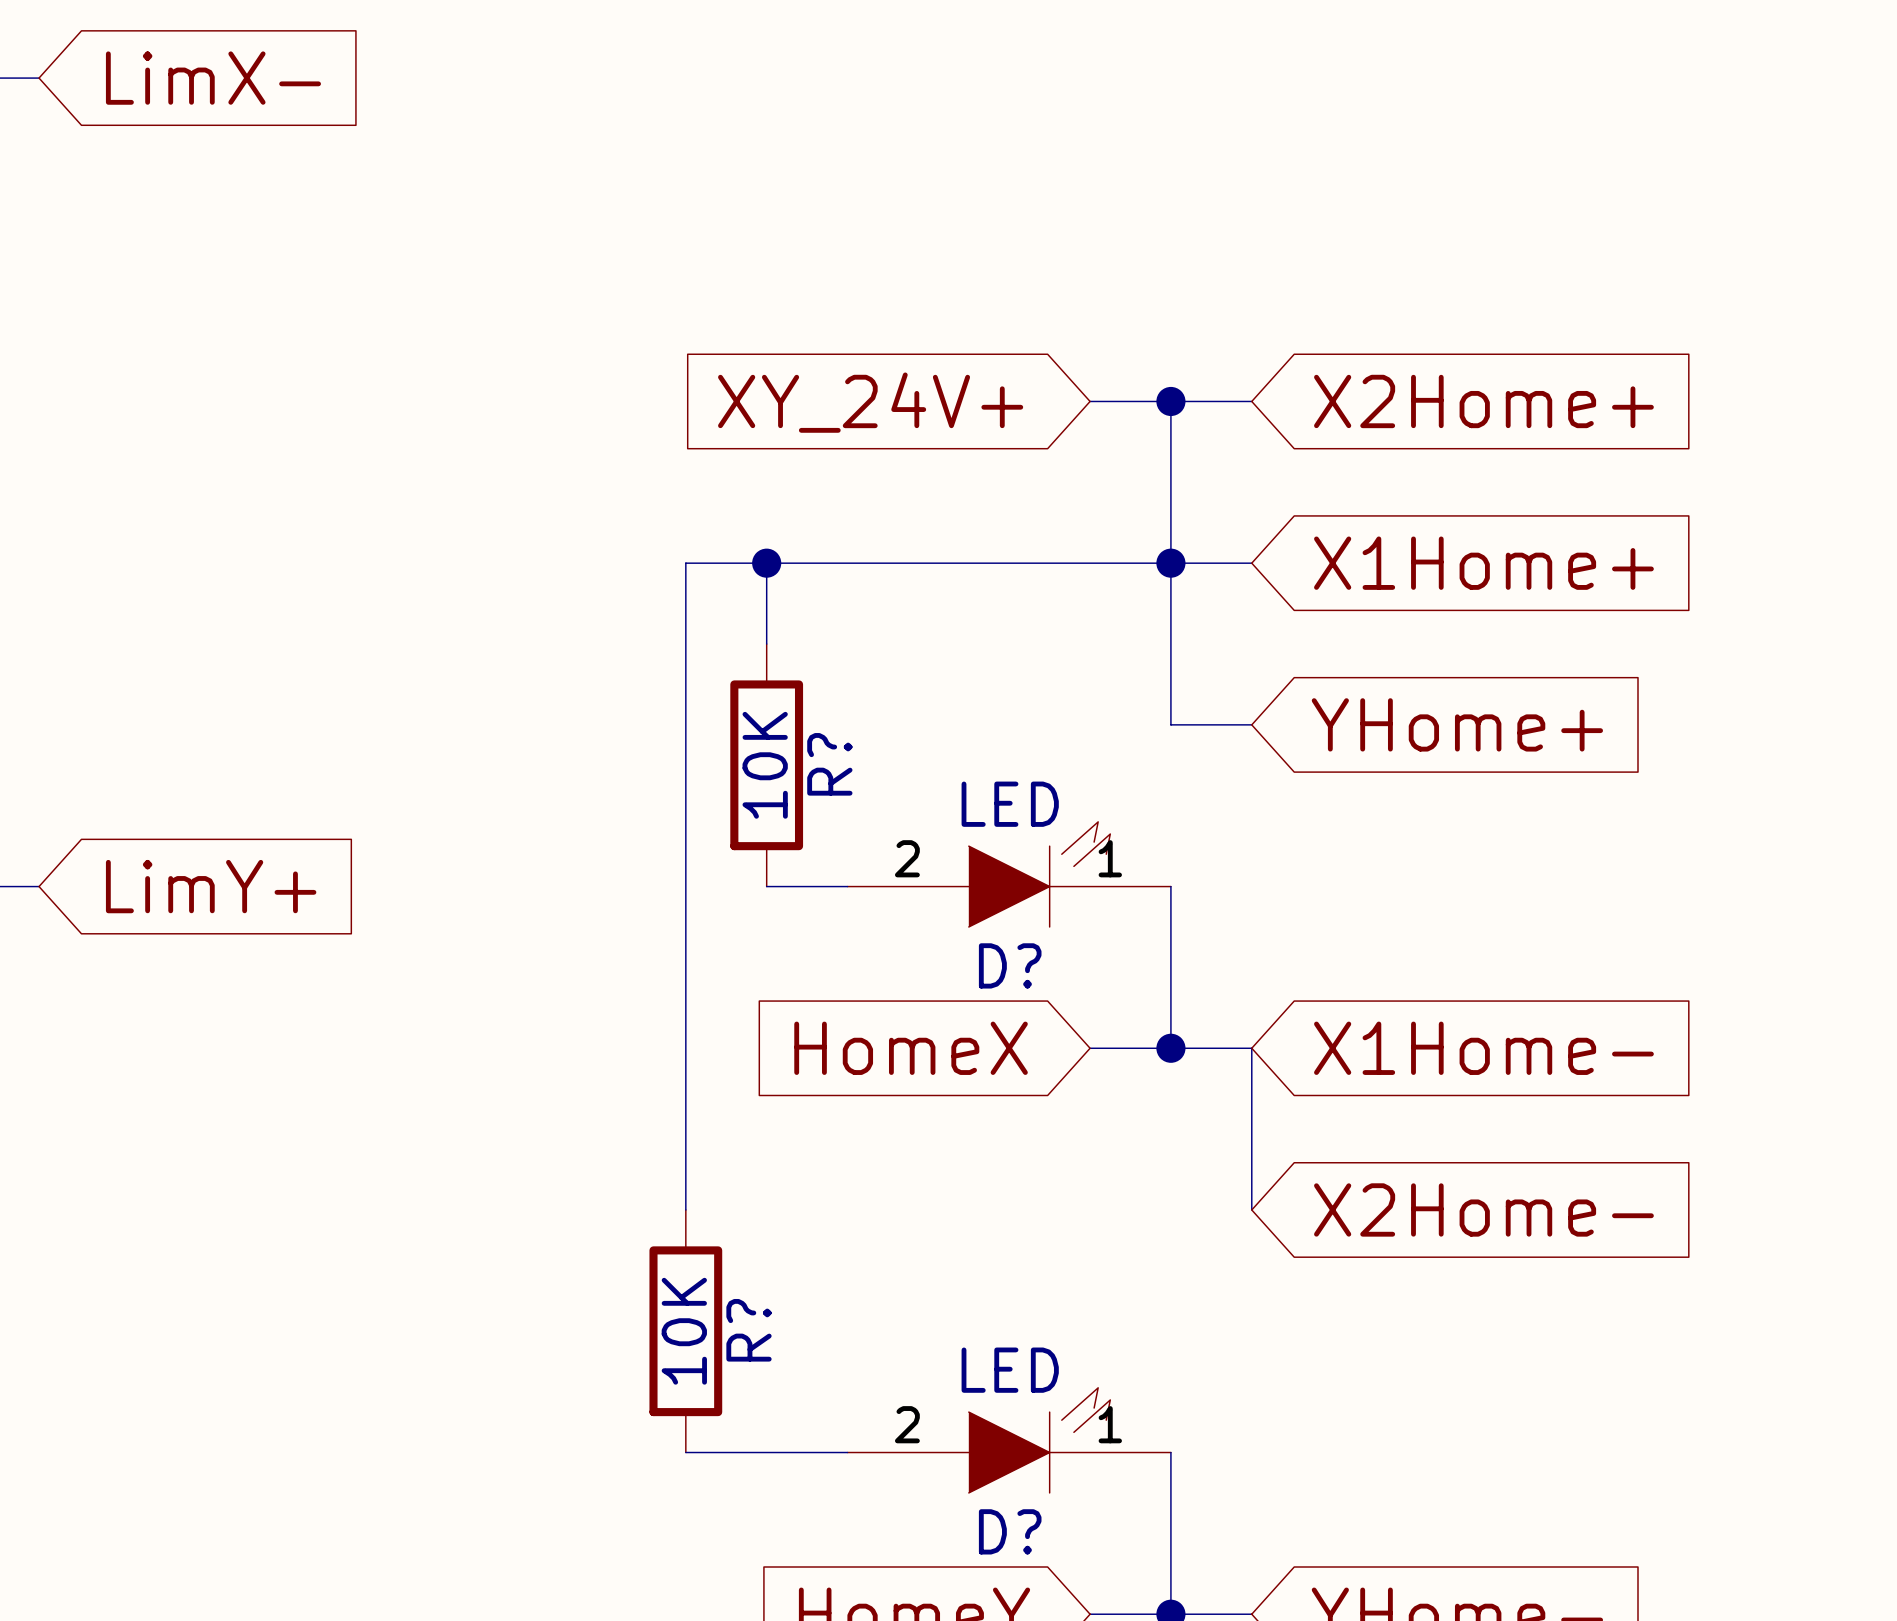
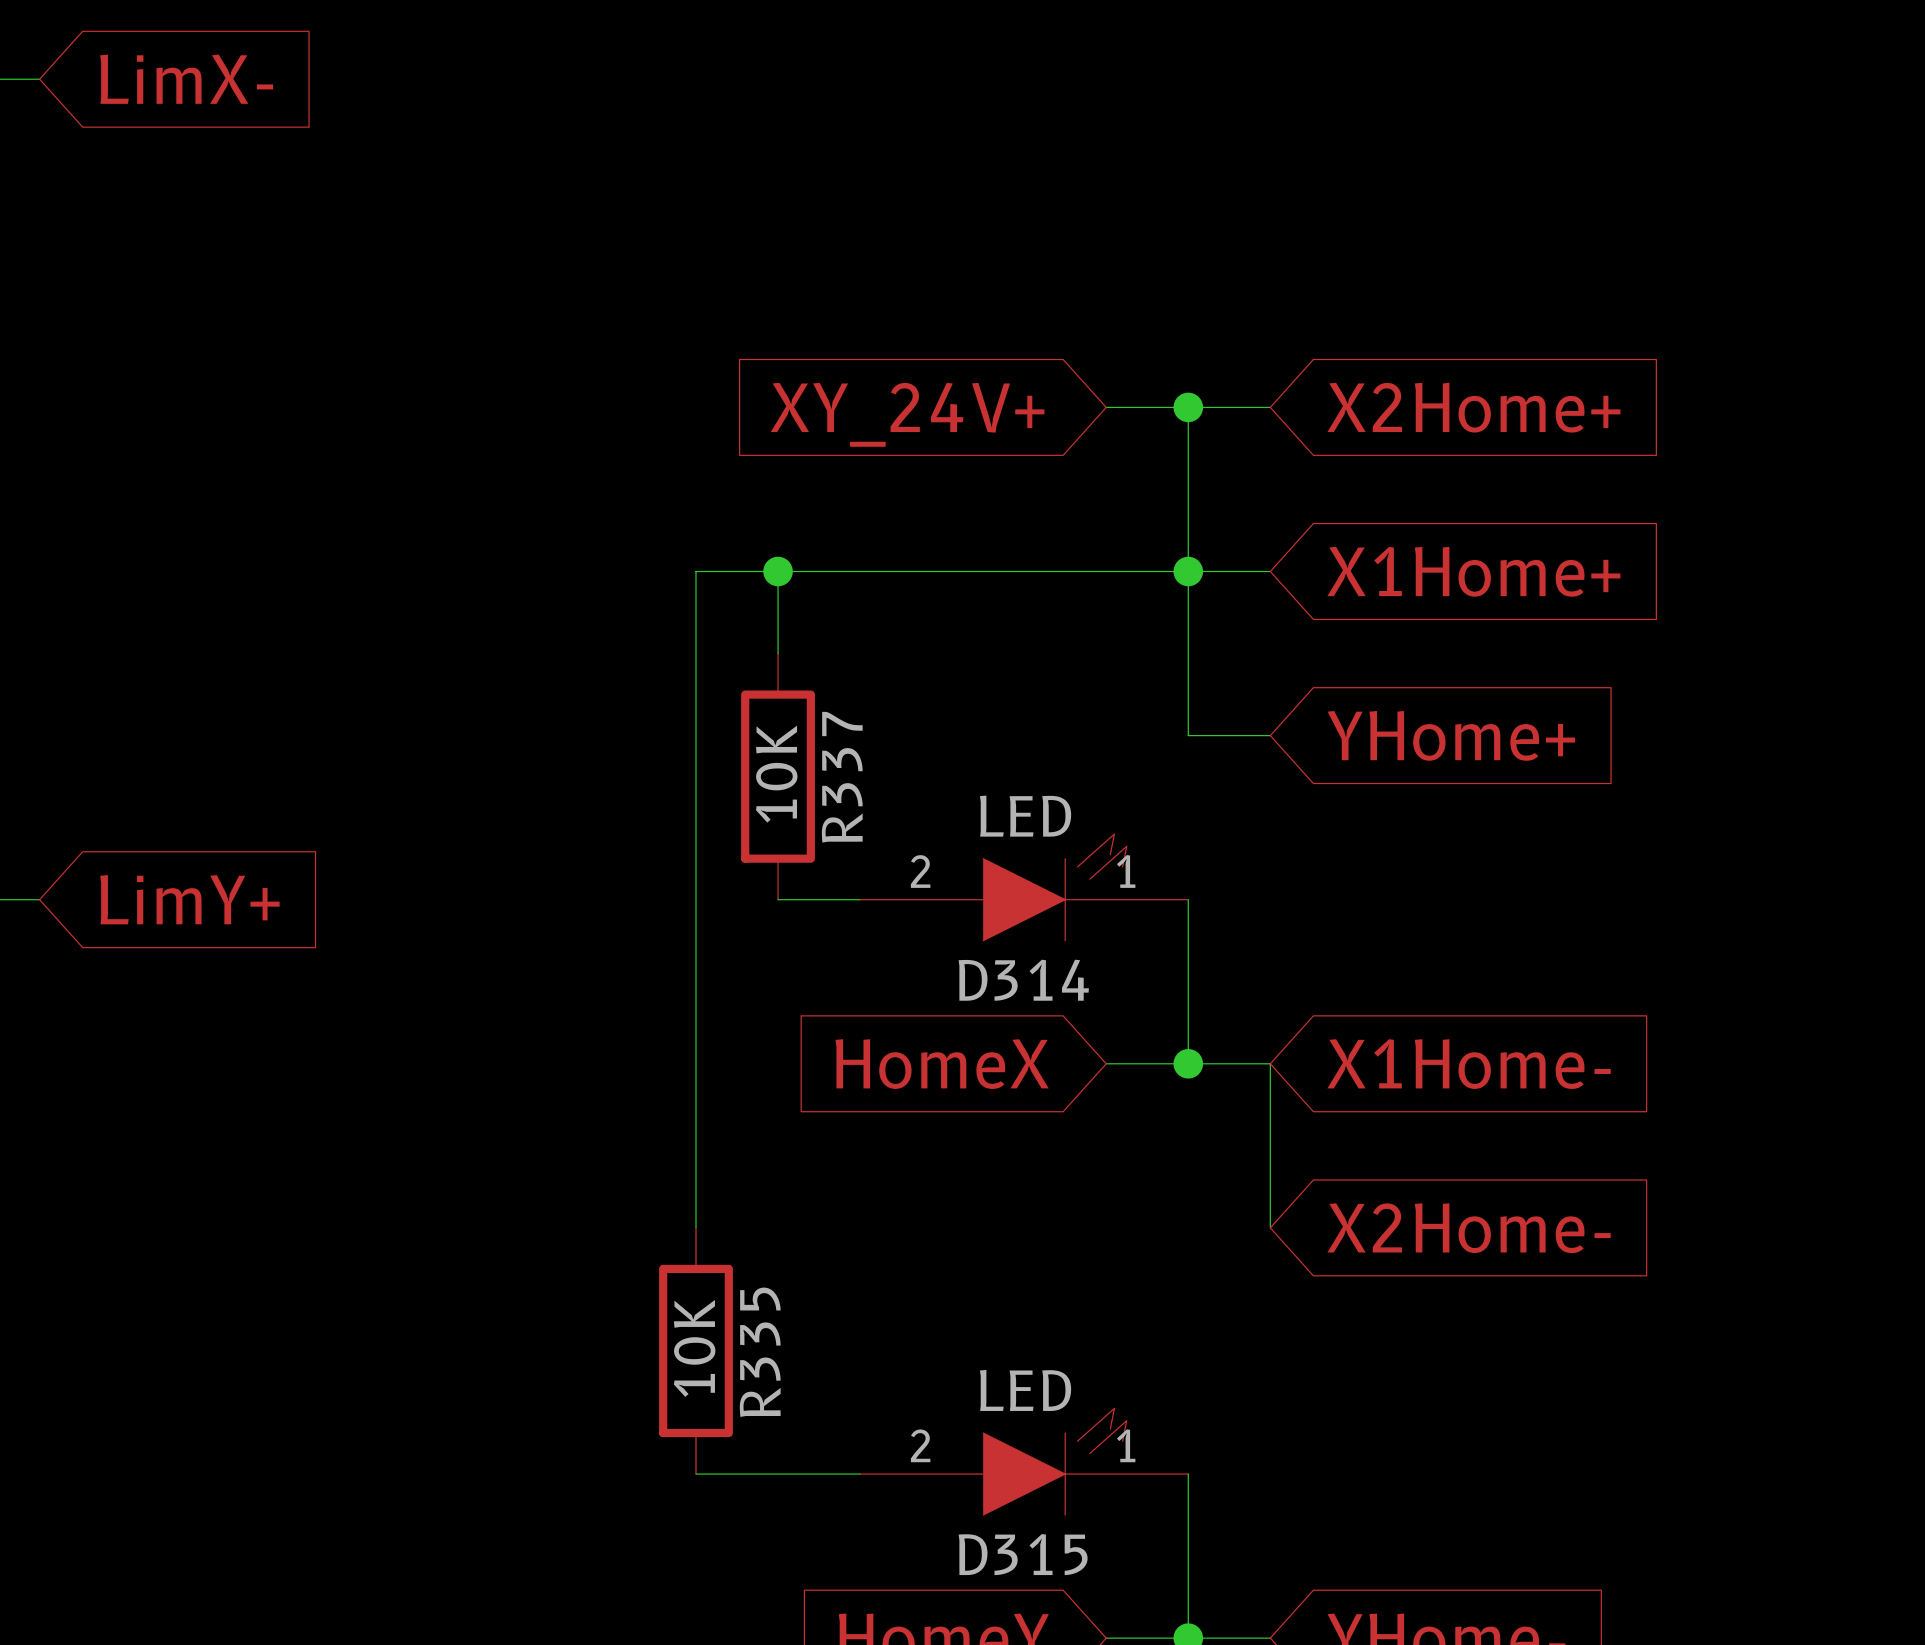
R? name: R? (829, 764) -> R337 (842, 777)
D? name: D? (1010, 965) -> D314 (1023, 980)
R? name: R? (749, 1330) -> R335 (760, 1352)
D? name: D? (1010, 1531) -> D315 (1023, 1554)

